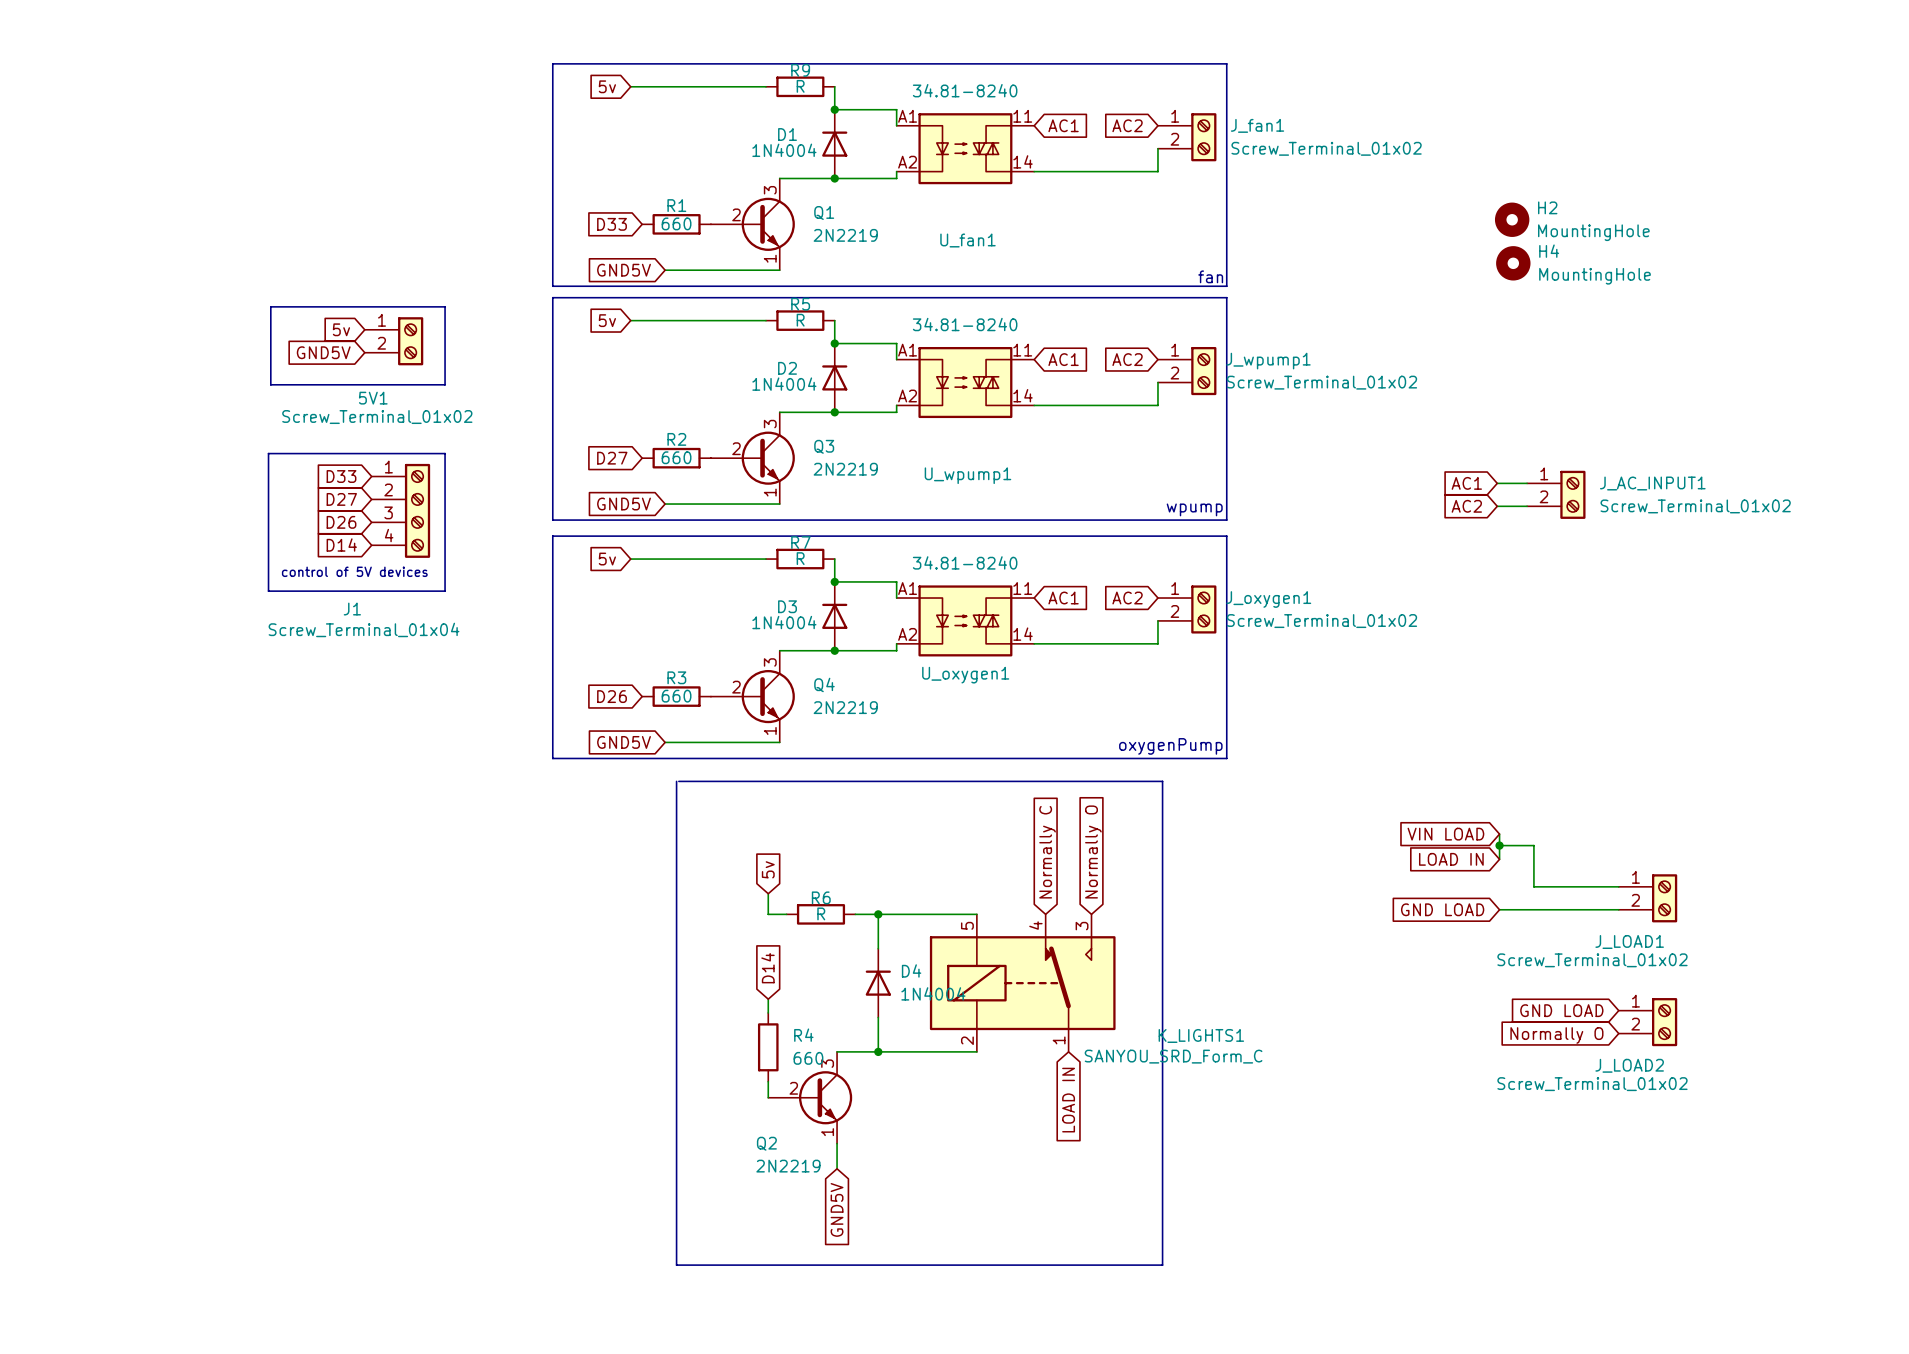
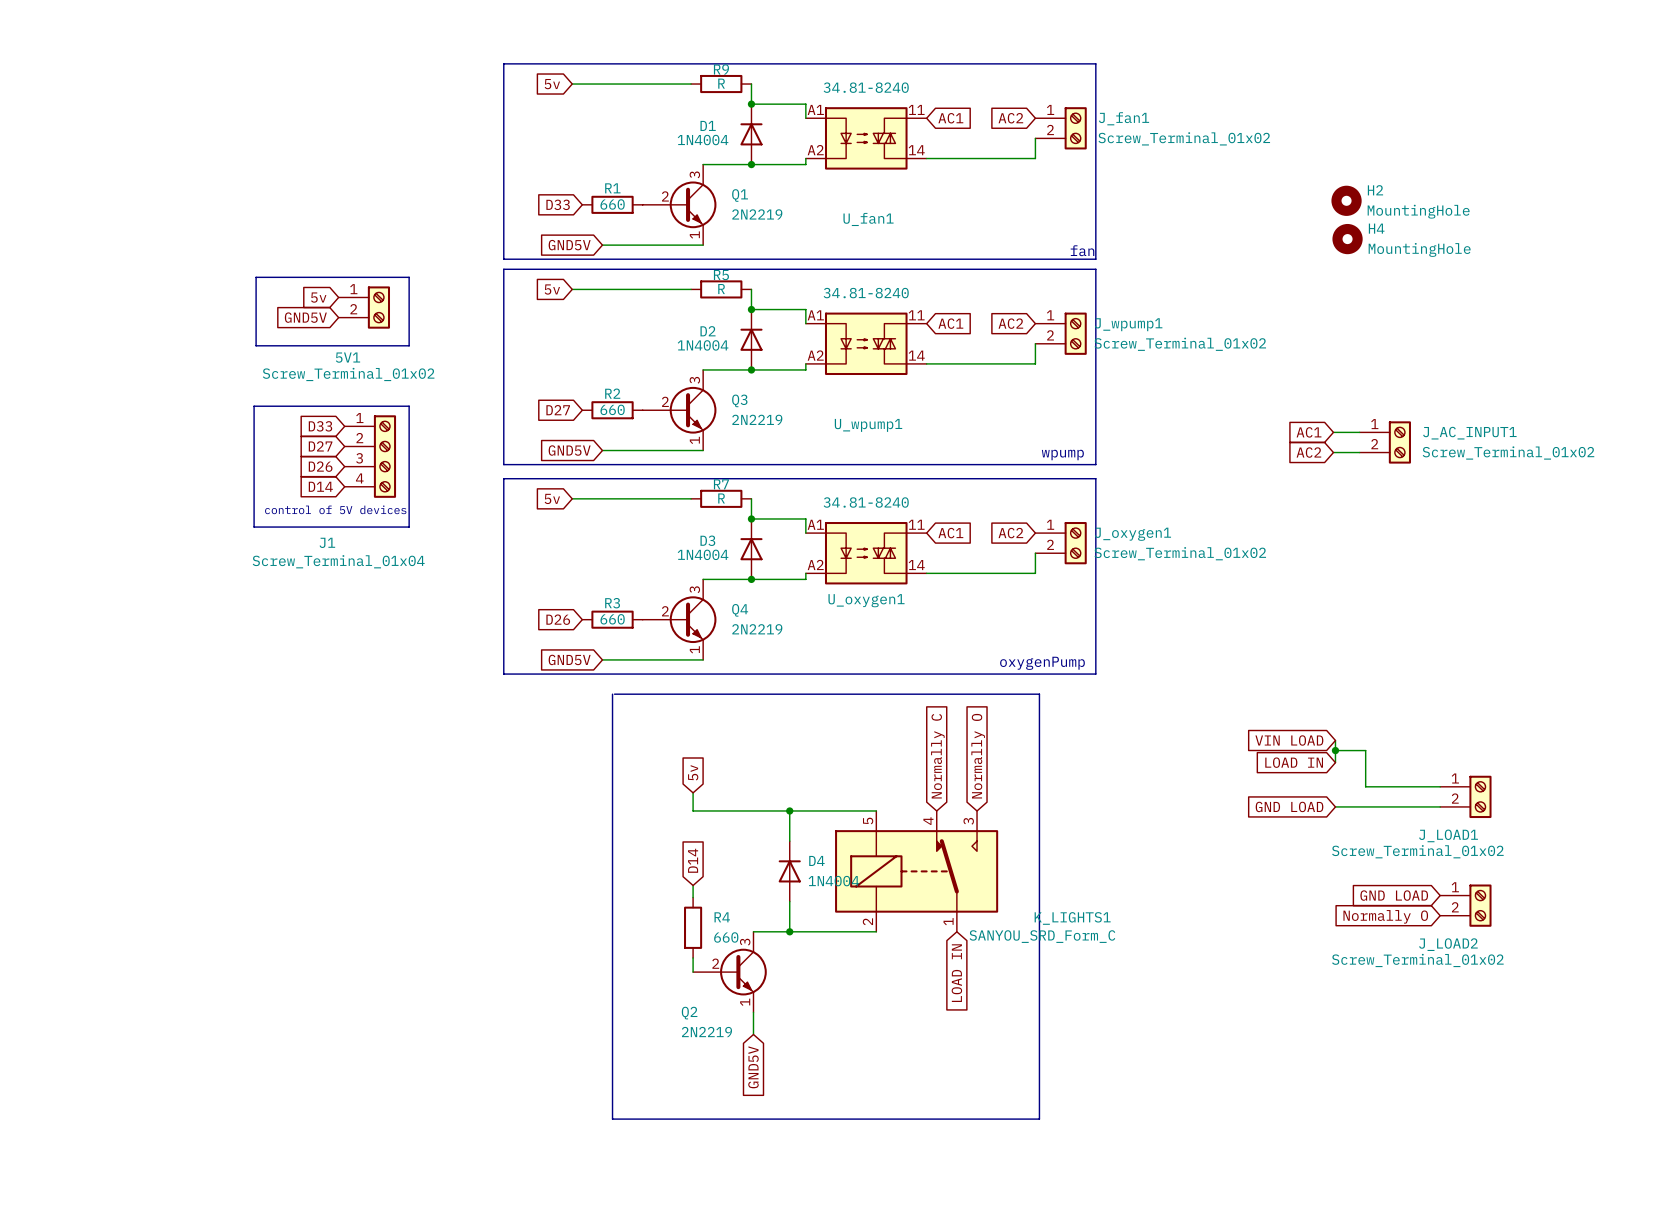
wire: none -> (709, 810) (769, 810)
R6: R (821, 914) -> none

